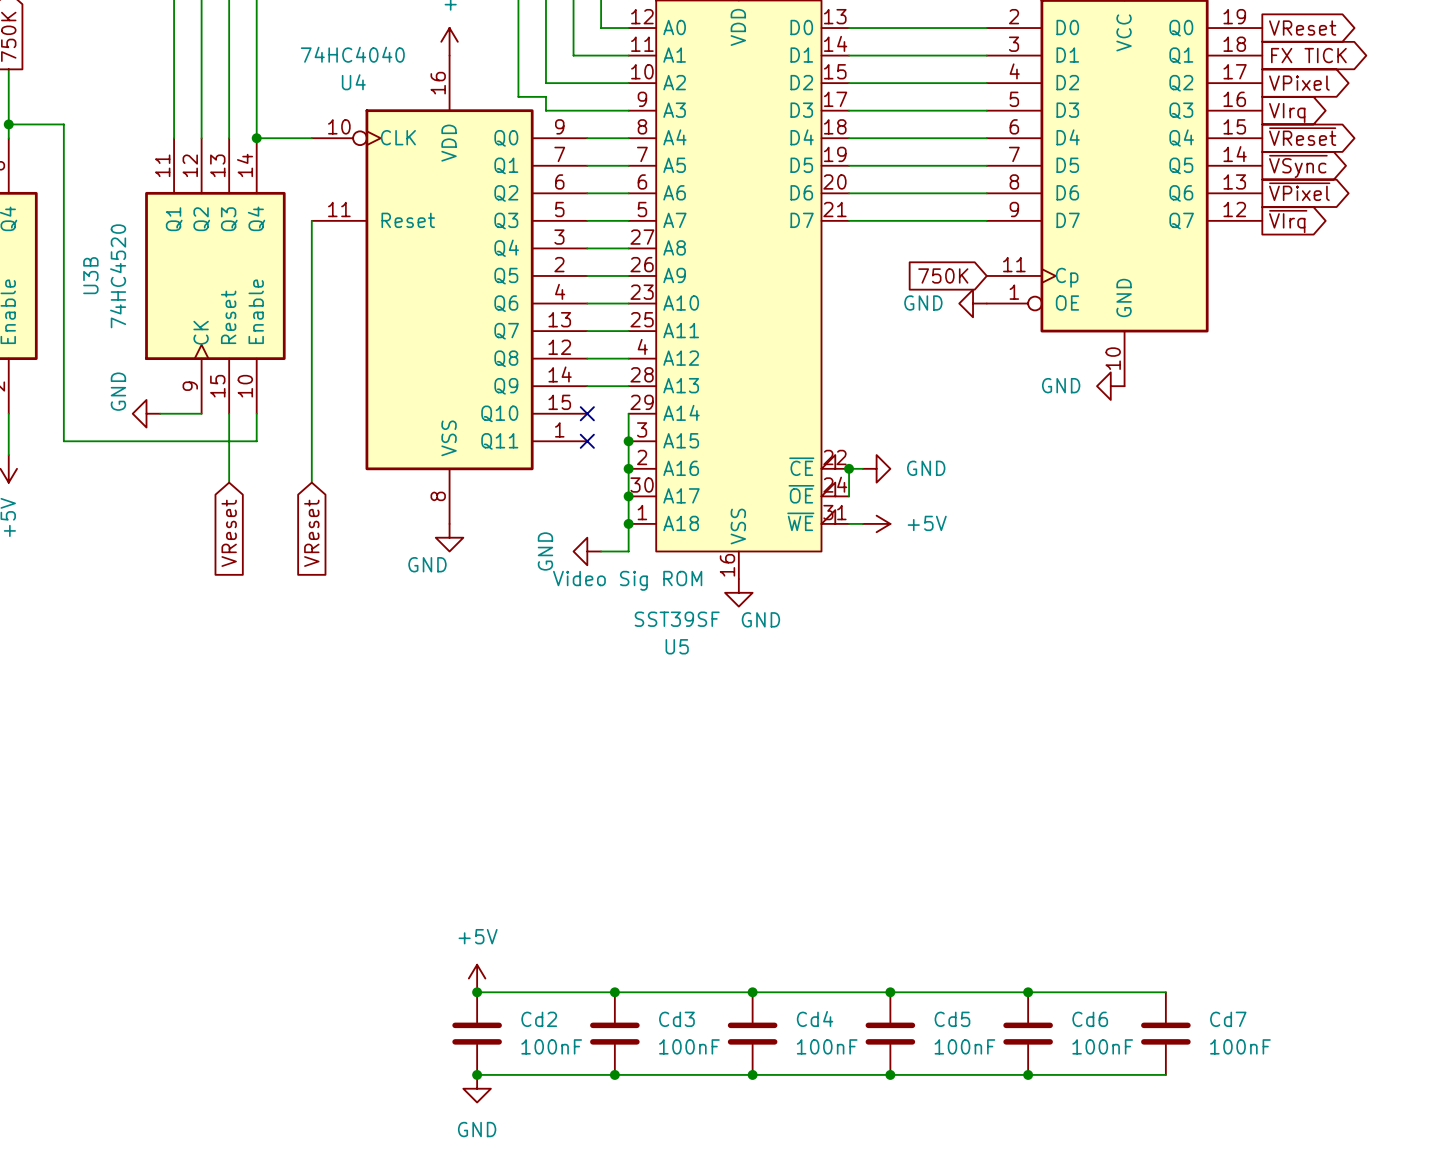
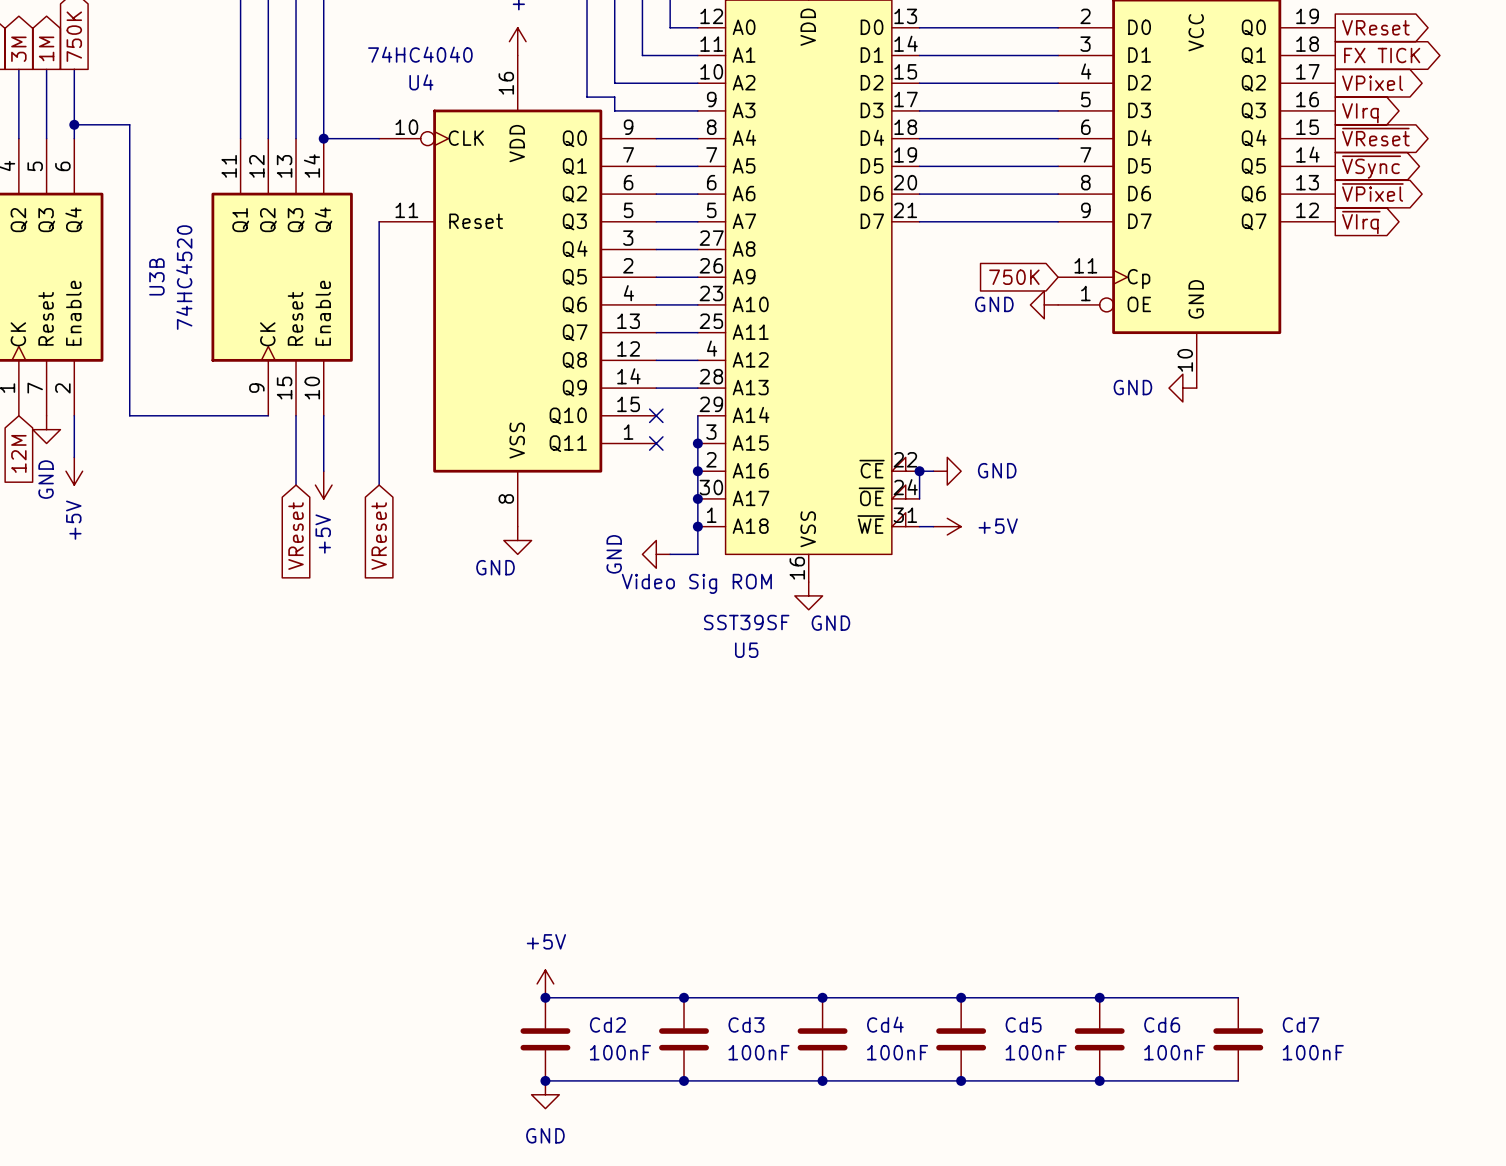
wire: (63, 413) (63, 441) (256, 441) -> (129, 415) (226, 415)
power symbol: GND (146, 413) -> none
wire: none -> (323, 443) (323, 471)
power symbol: none -> +5V (323, 485)

